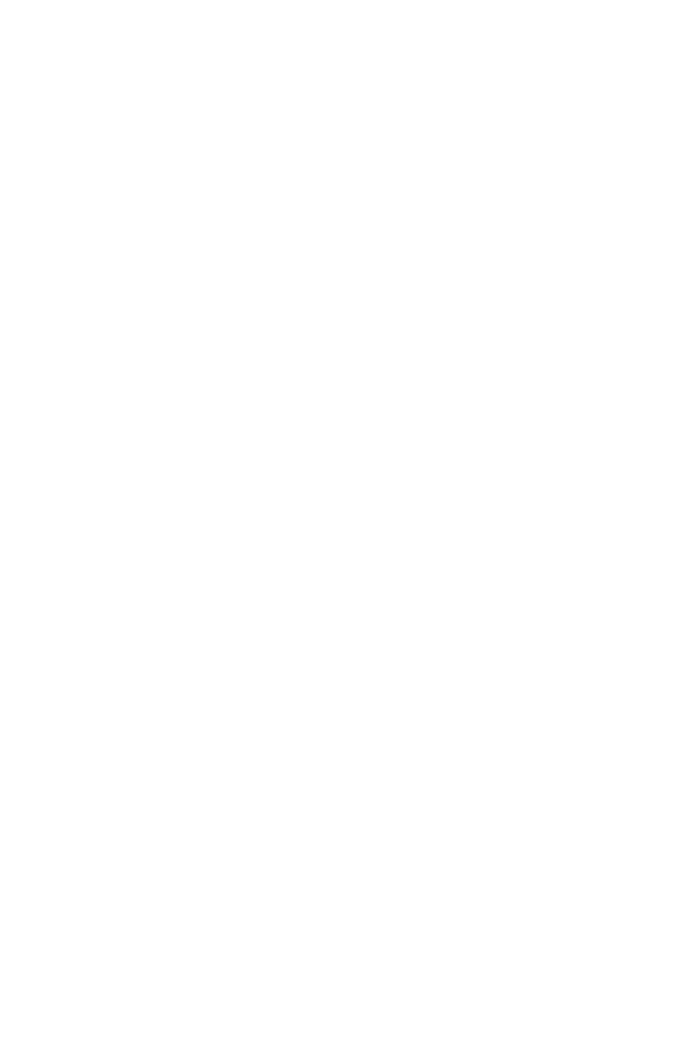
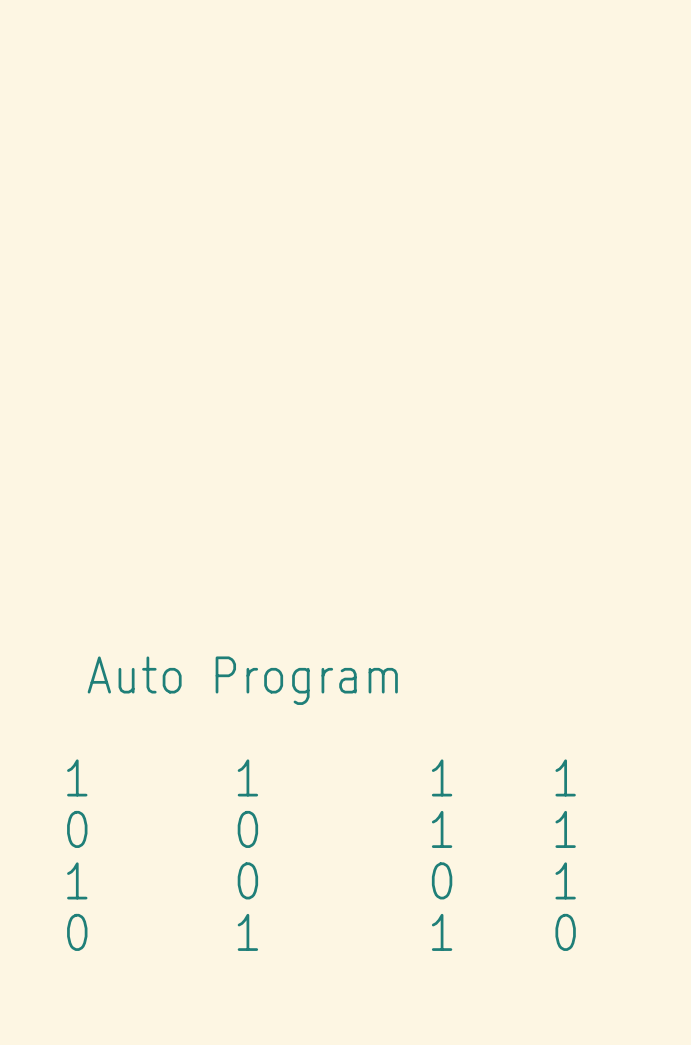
text: none -> Auto Program (242, 680)
text: none -> 1 1 1 1 (321, 777)
text: none -> 0 0 1 1 (321, 829)
text: none -> 1 0 0 1 (321, 880)
text: none -> 0 1 1 0 (321, 932)

